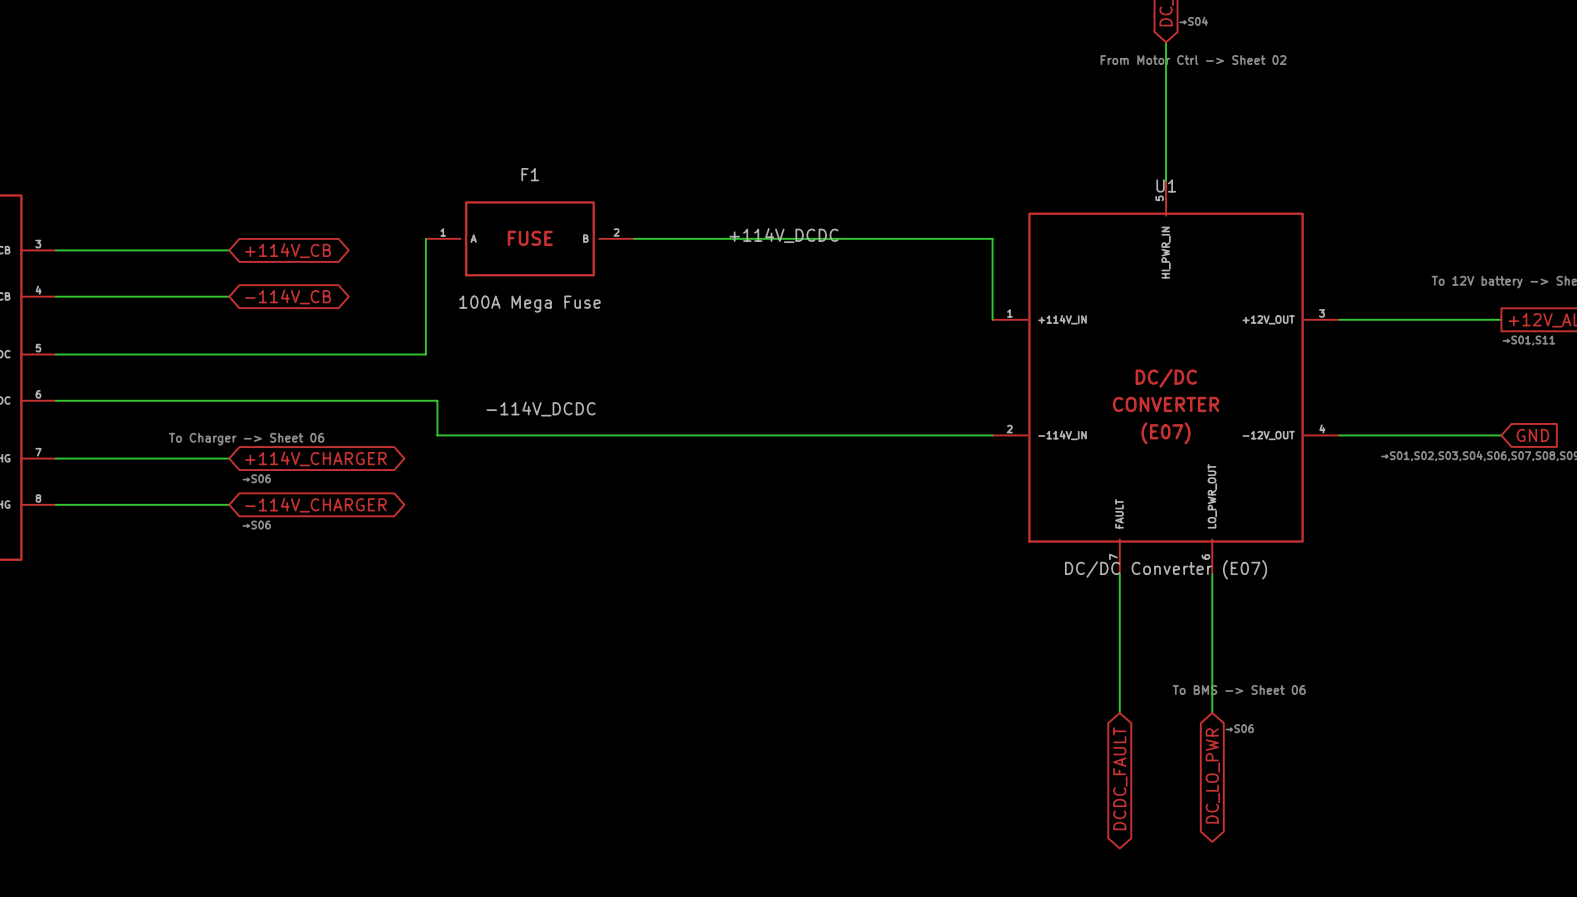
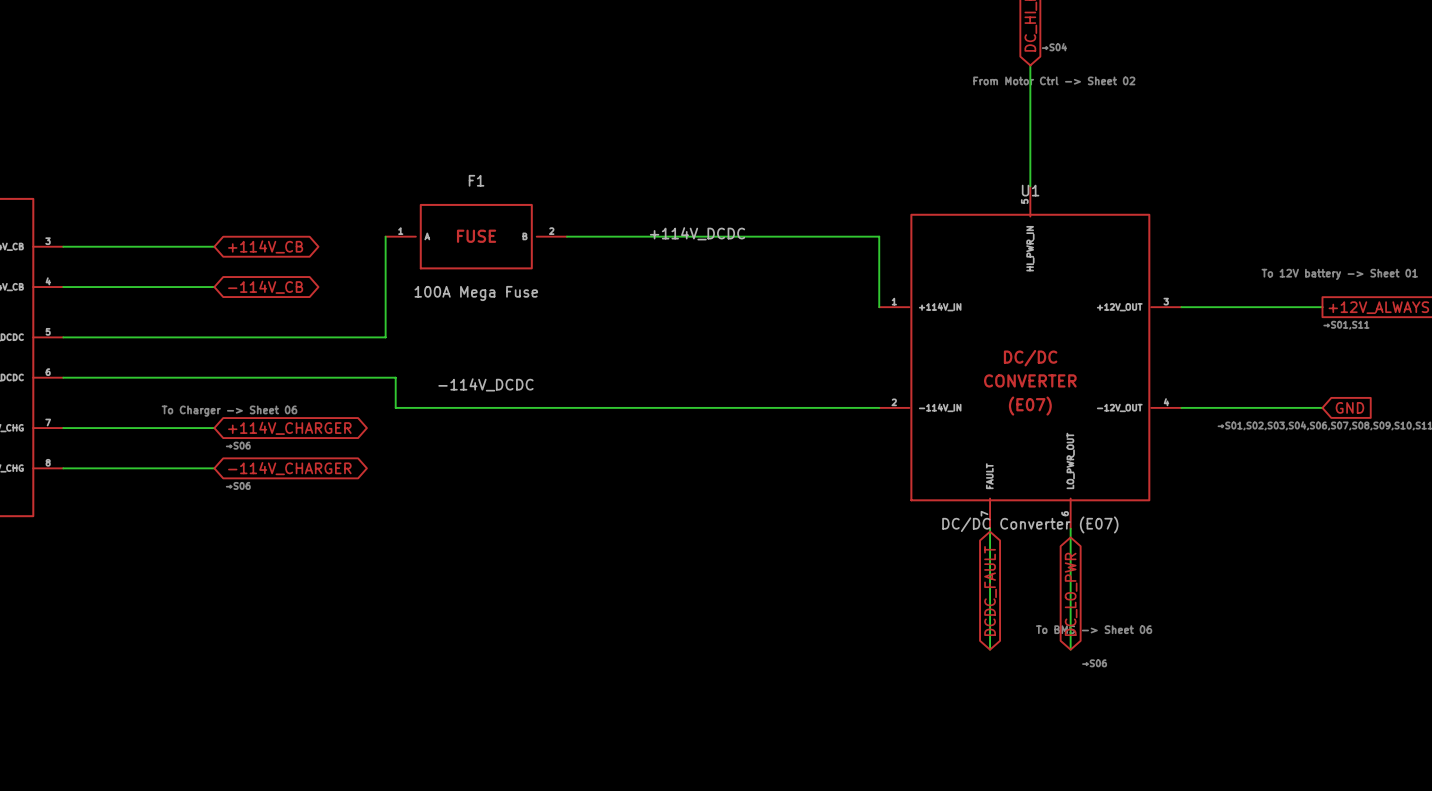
global label rotation: 0° (1212, 775) -> 180° (1071, 594)
global label rotation: 0° (1120, 778) -> 180° (990, 591)

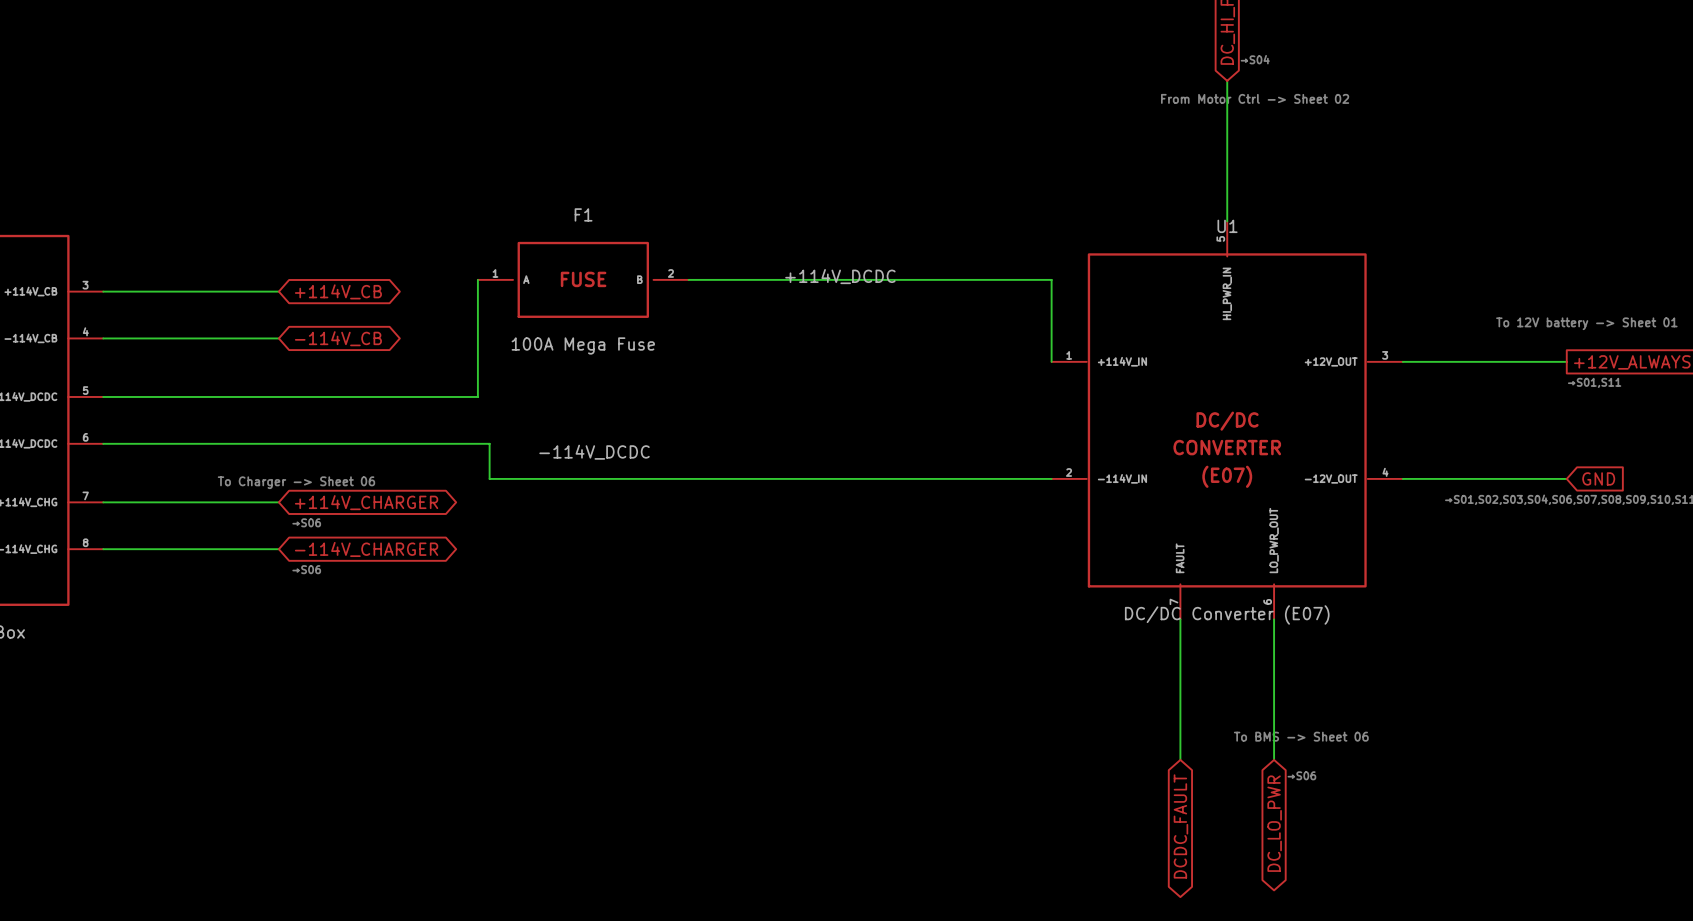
global label rotation: 0° (990, 591) -> 180° (1180, 826)
global label rotation: 0° (1071, 594) -> 180° (1274, 823)

